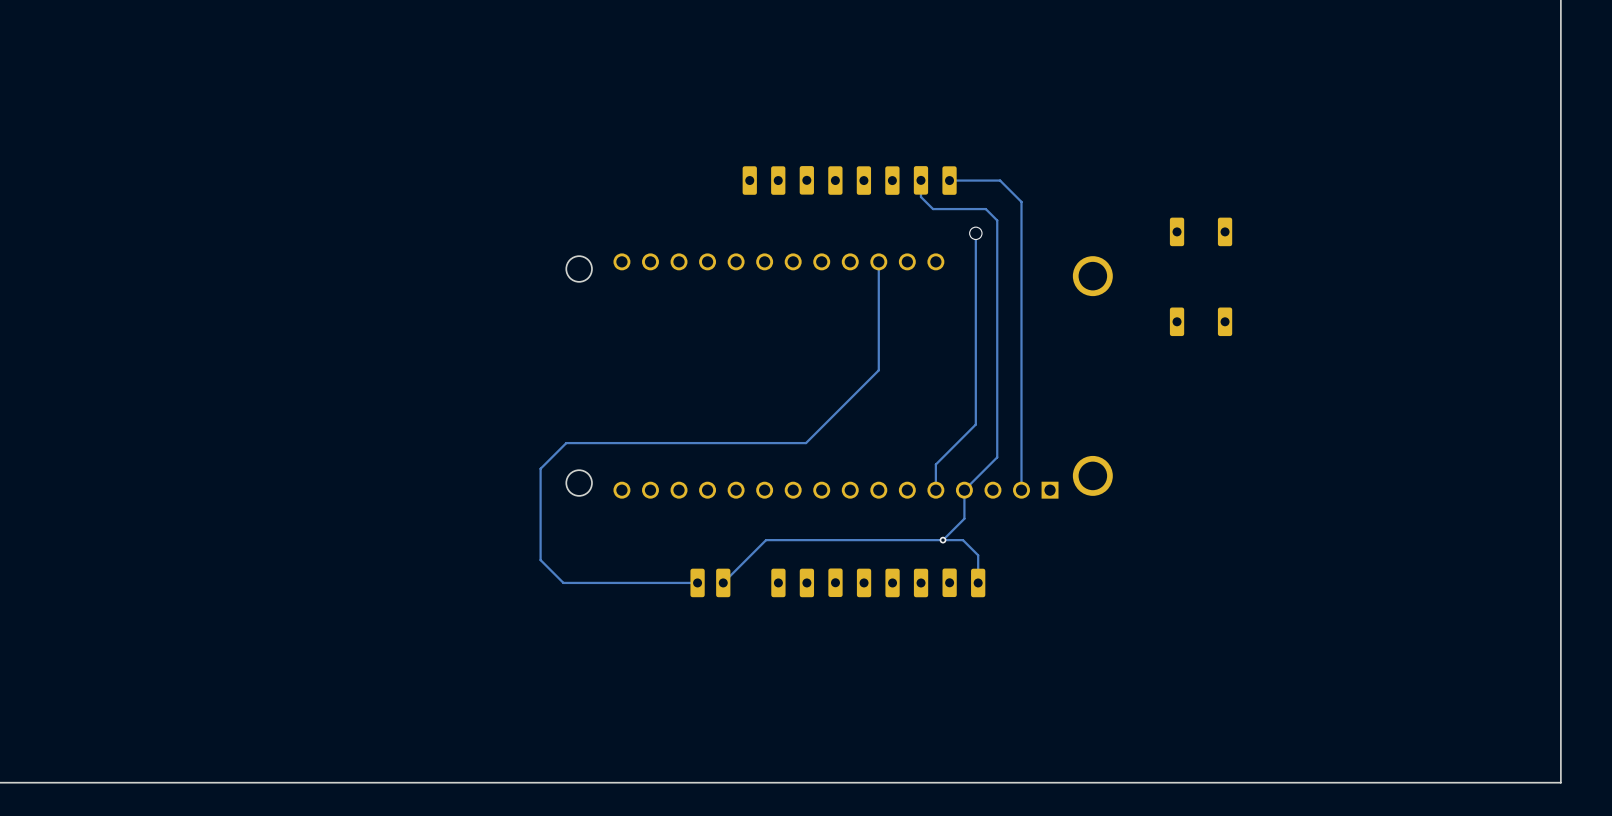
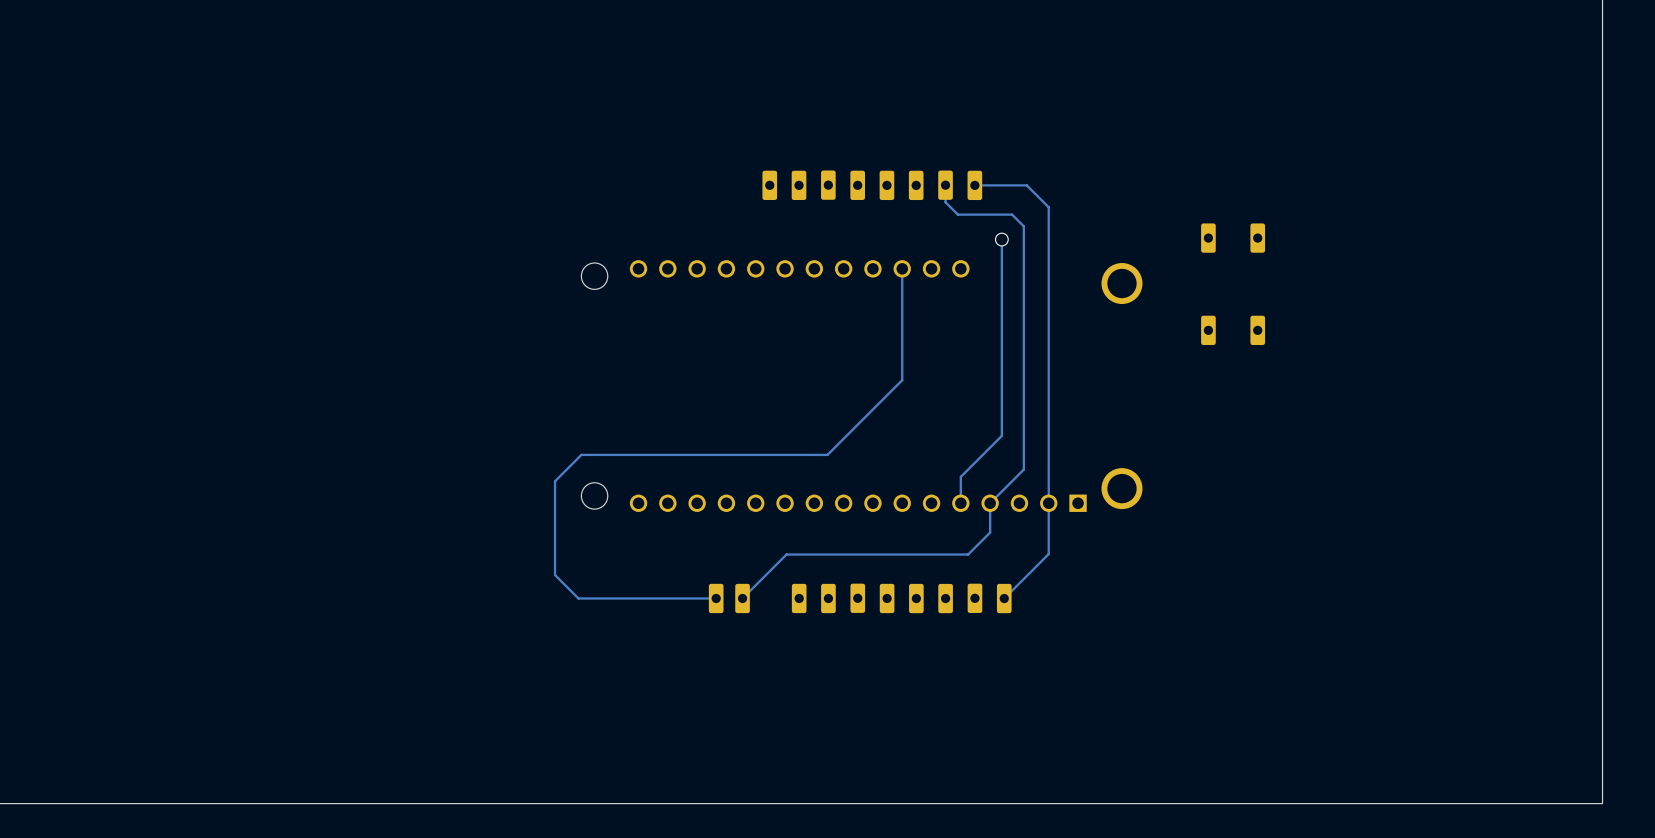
track: (943, 540) (962, 540) (978, 555) (978, 582) -> (1048, 503) (1048, 554) (1004, 598)
via: (943, 540) -> none

